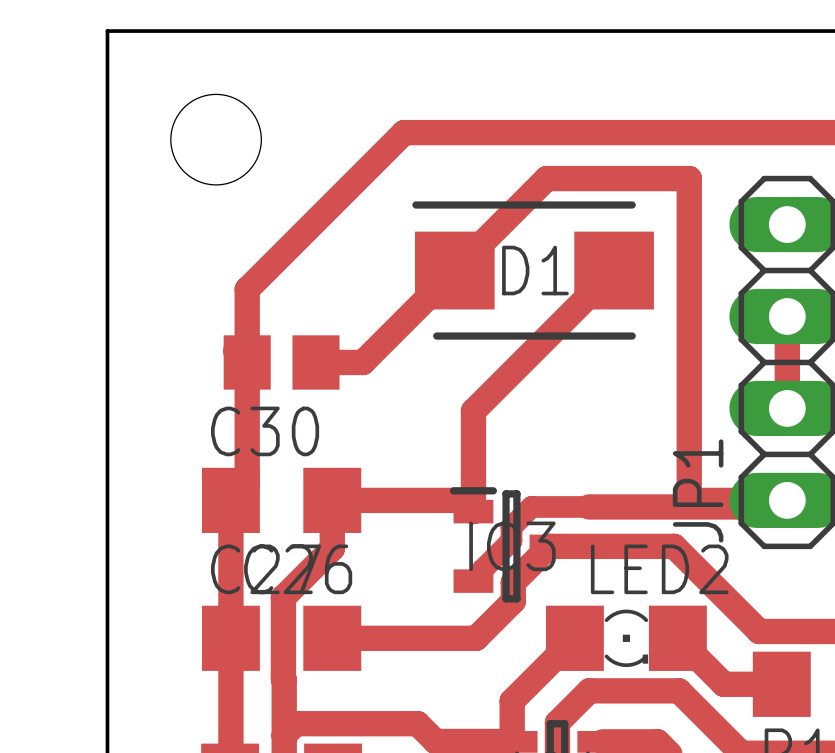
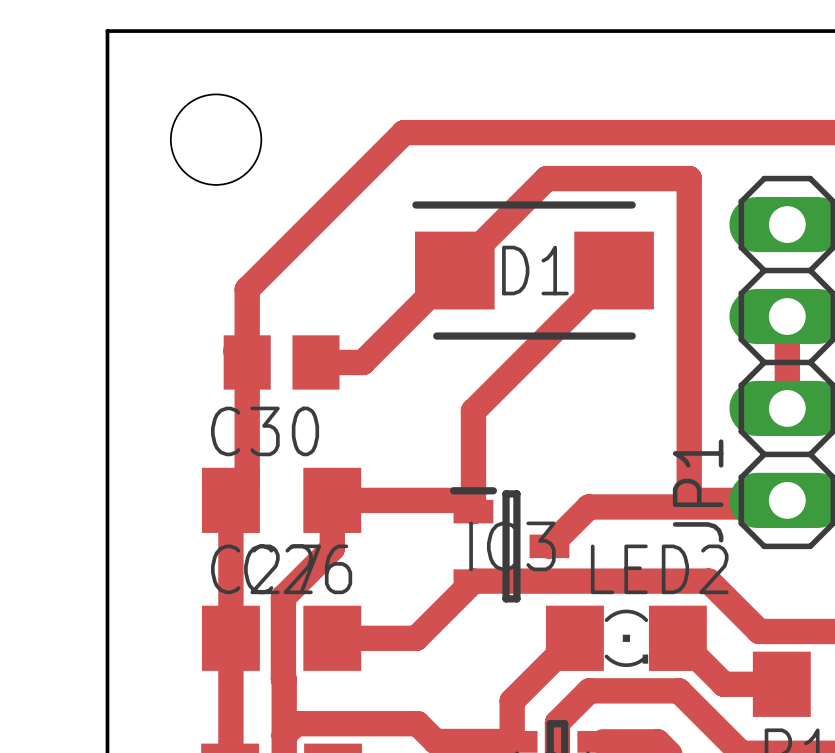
track: (588, 506) (531, 506) (511, 527) (511, 540) (473, 581) -> (588, 506) (549, 546)
track: (708, 581) (674, 546) (549, 546) (513, 582) (513, 601) (476, 638) (416, 638) -> (708, 581) (473, 581) (416, 638)

